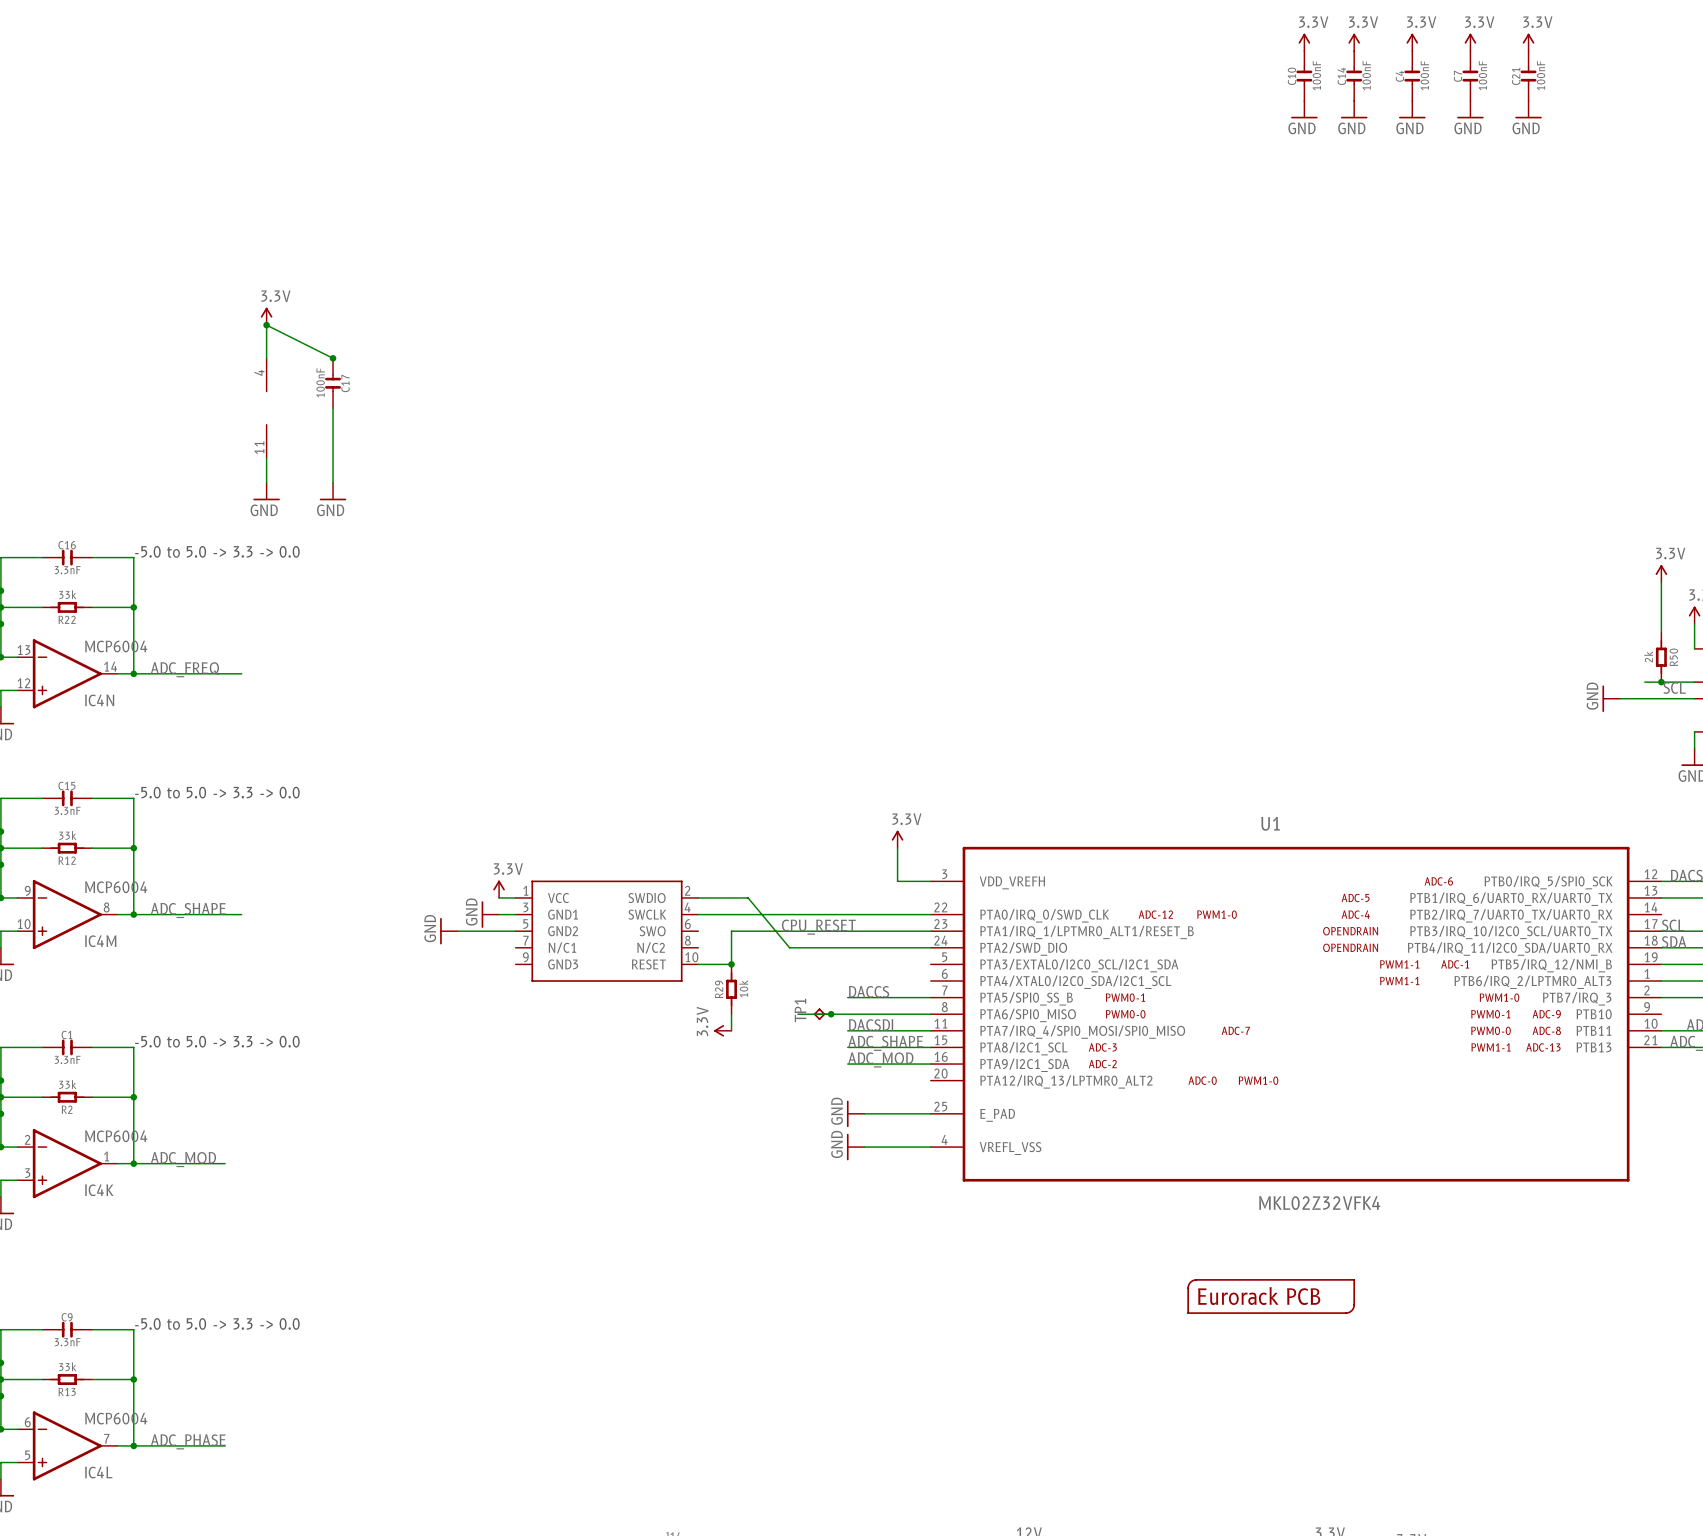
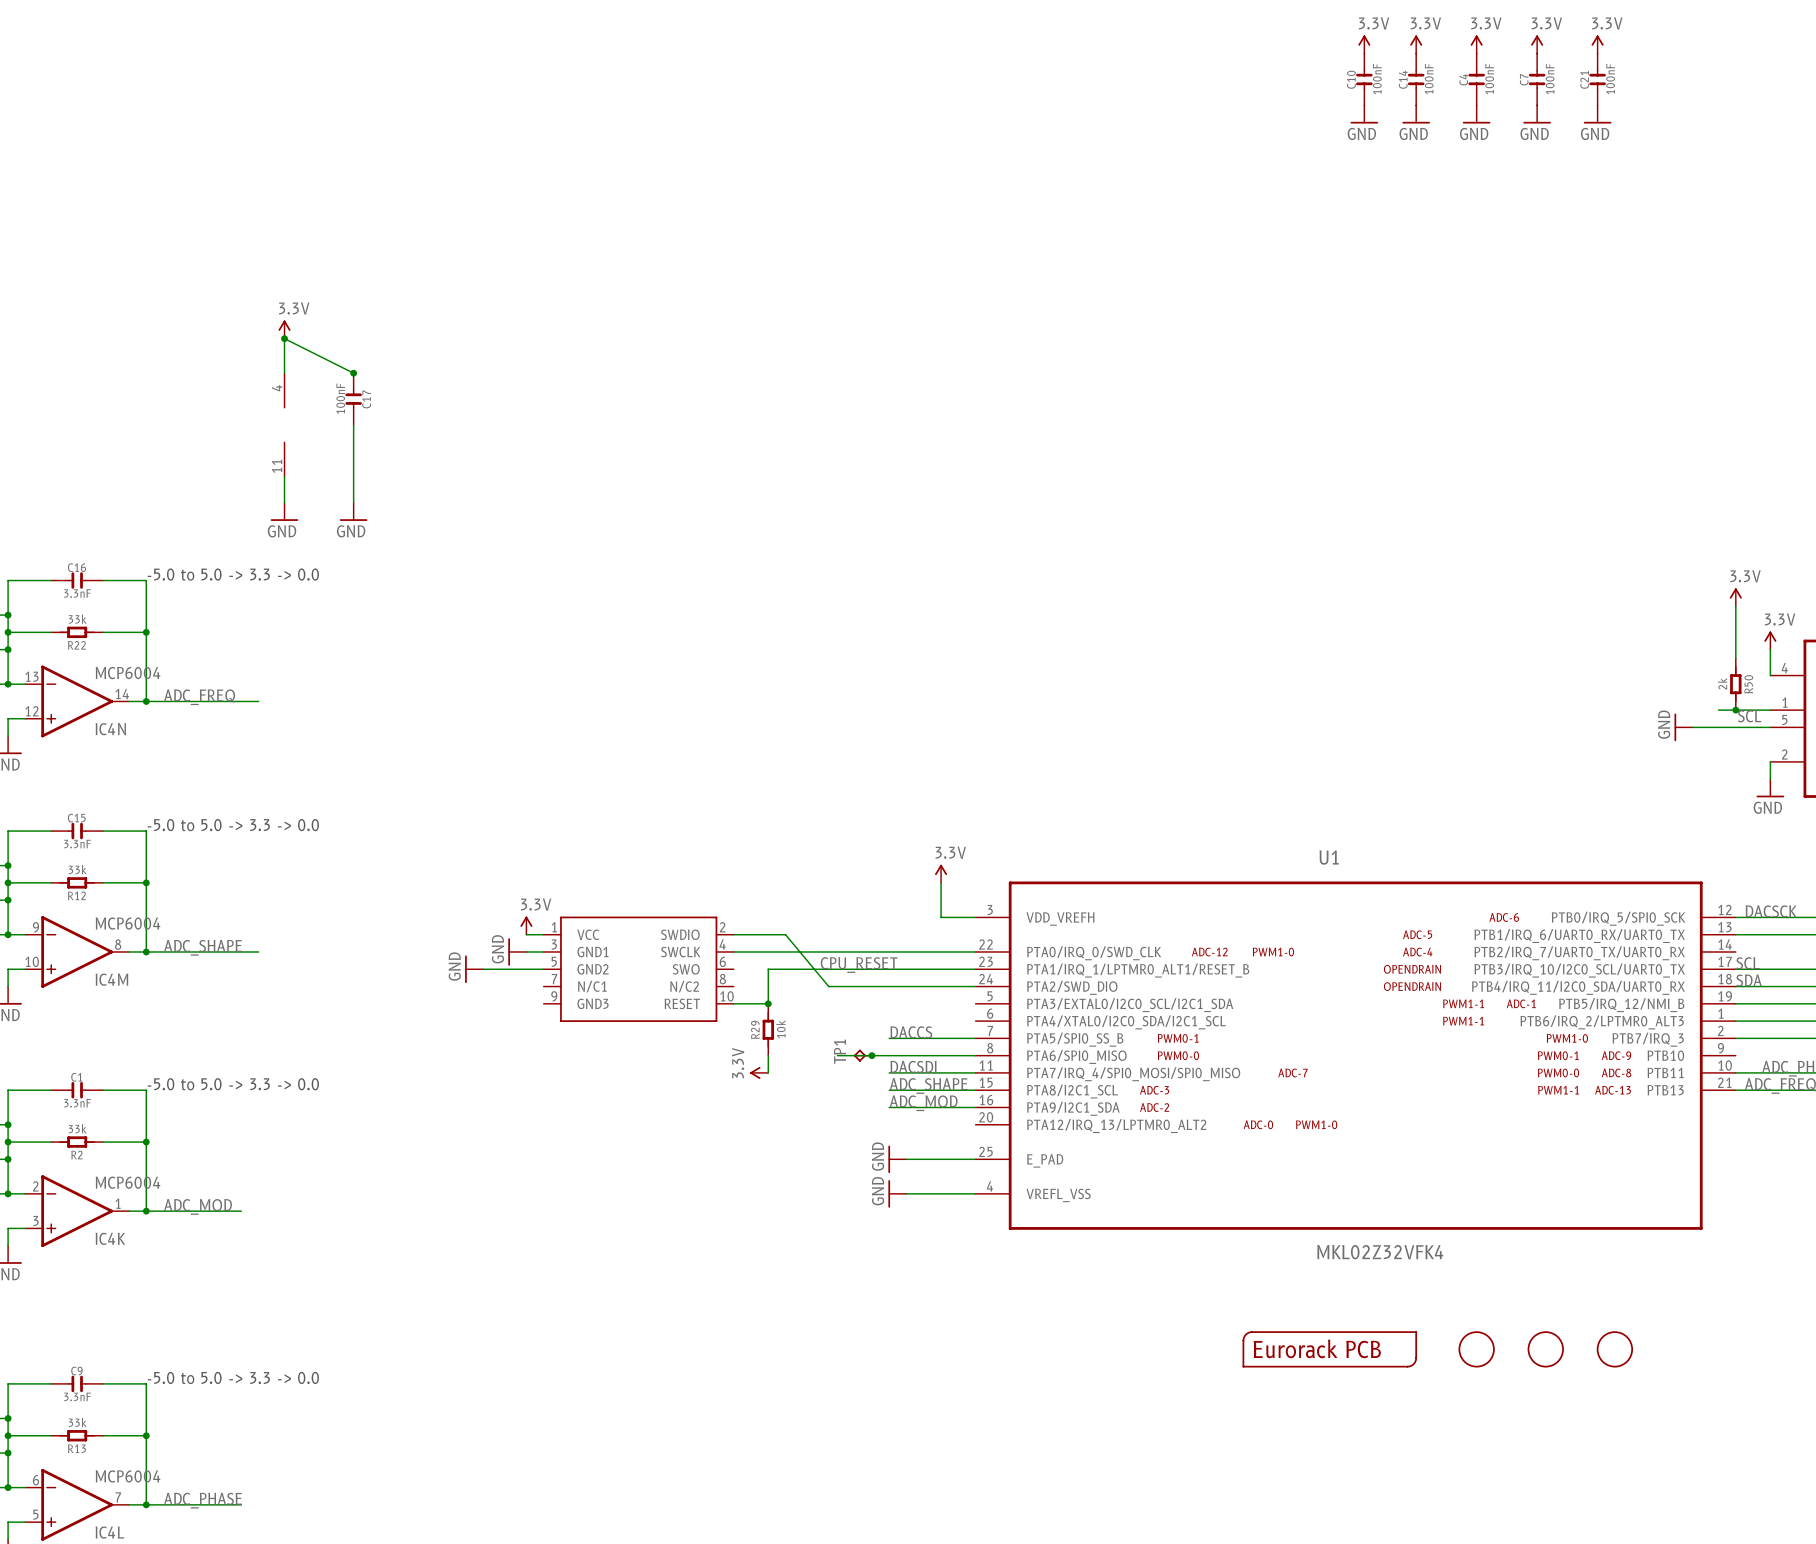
part: none -> (1476, 1349)
part: none -> (1545, 1349)
part: none -> (1614, 1349)

